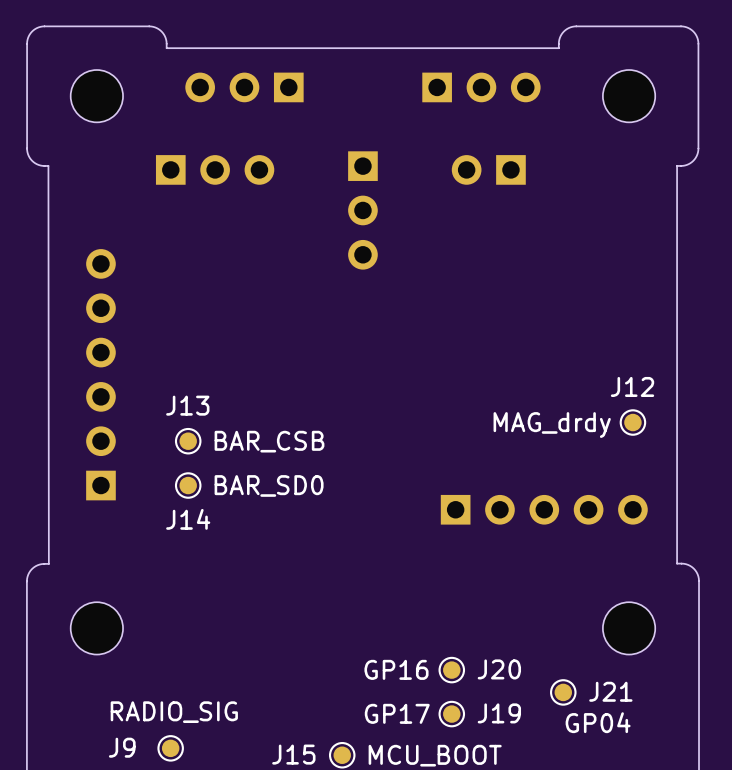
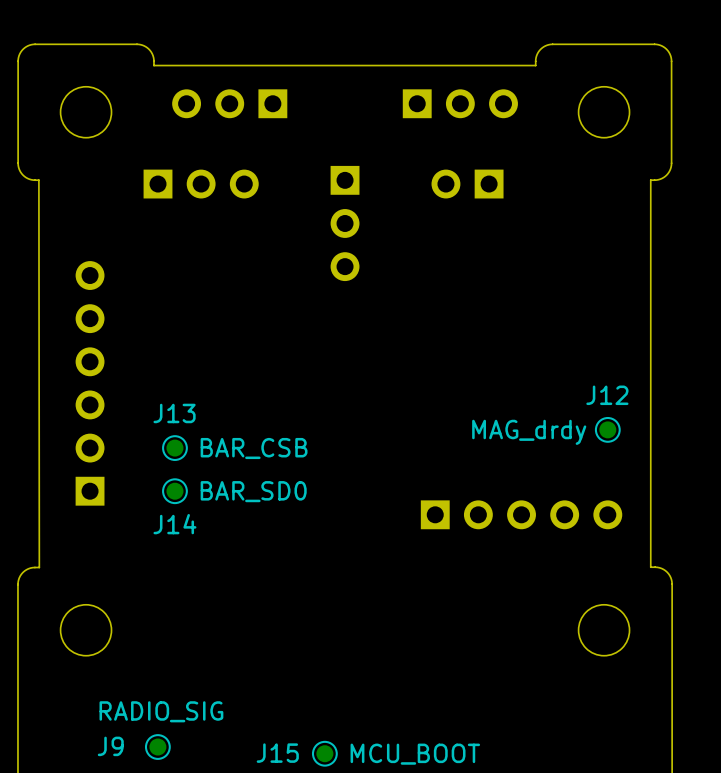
text: GP16 (396, 669) -> none
J20: (451, 670) -> none
J21: (563, 692) -> none
text: GP17 (397, 713) -> none
J19: (451, 714) -> none
text: GP04 (598, 722) -> none

